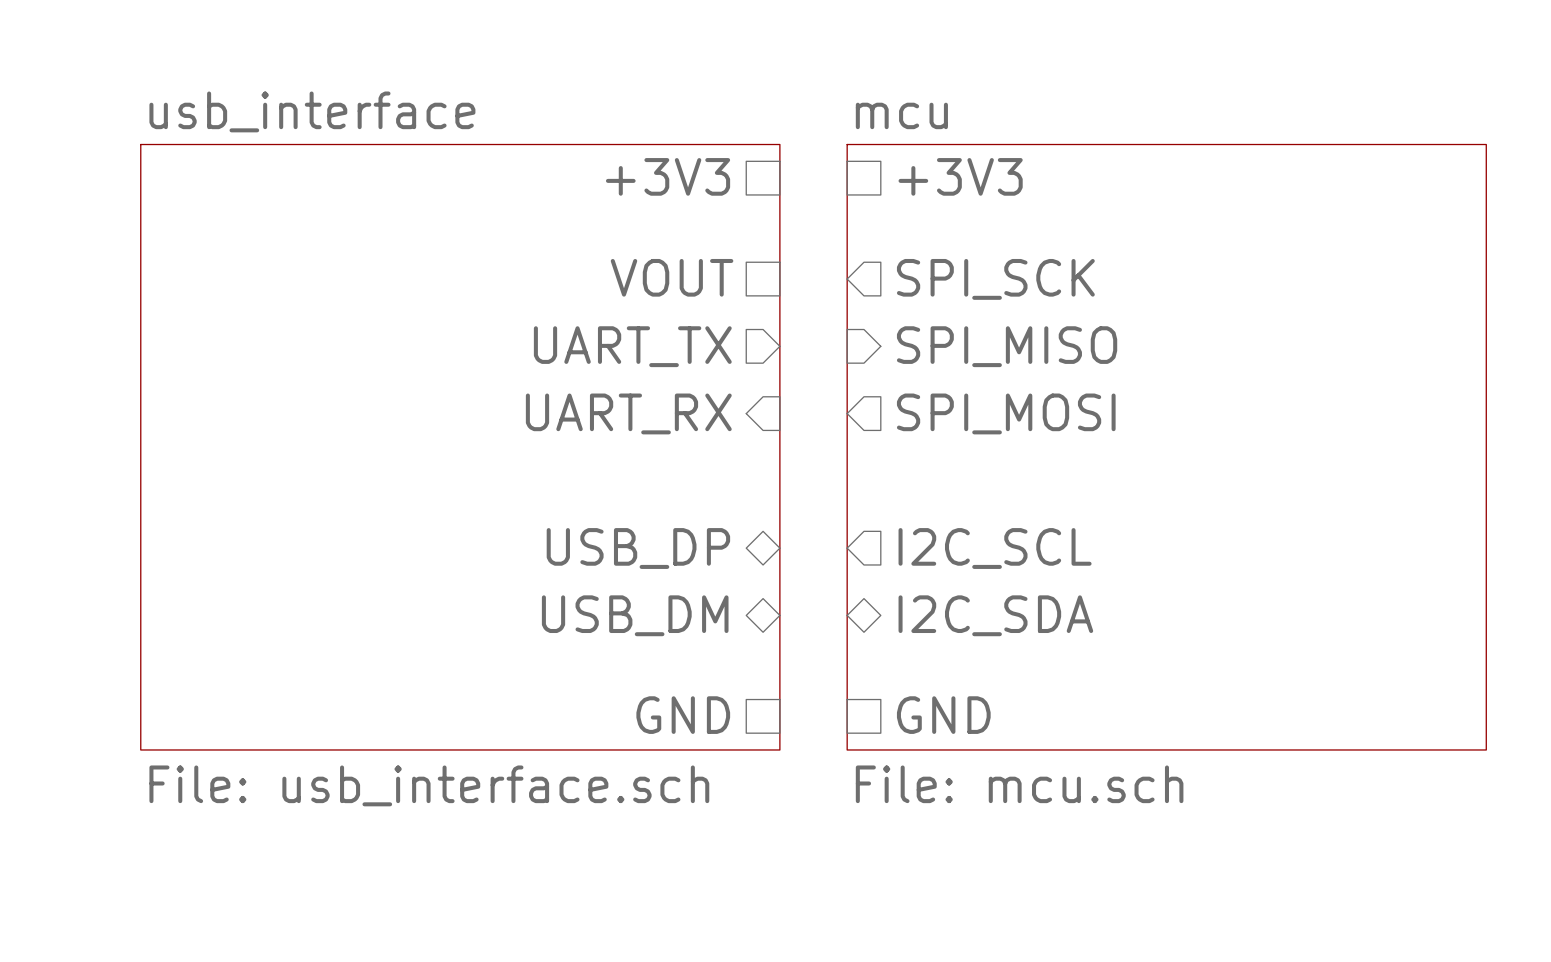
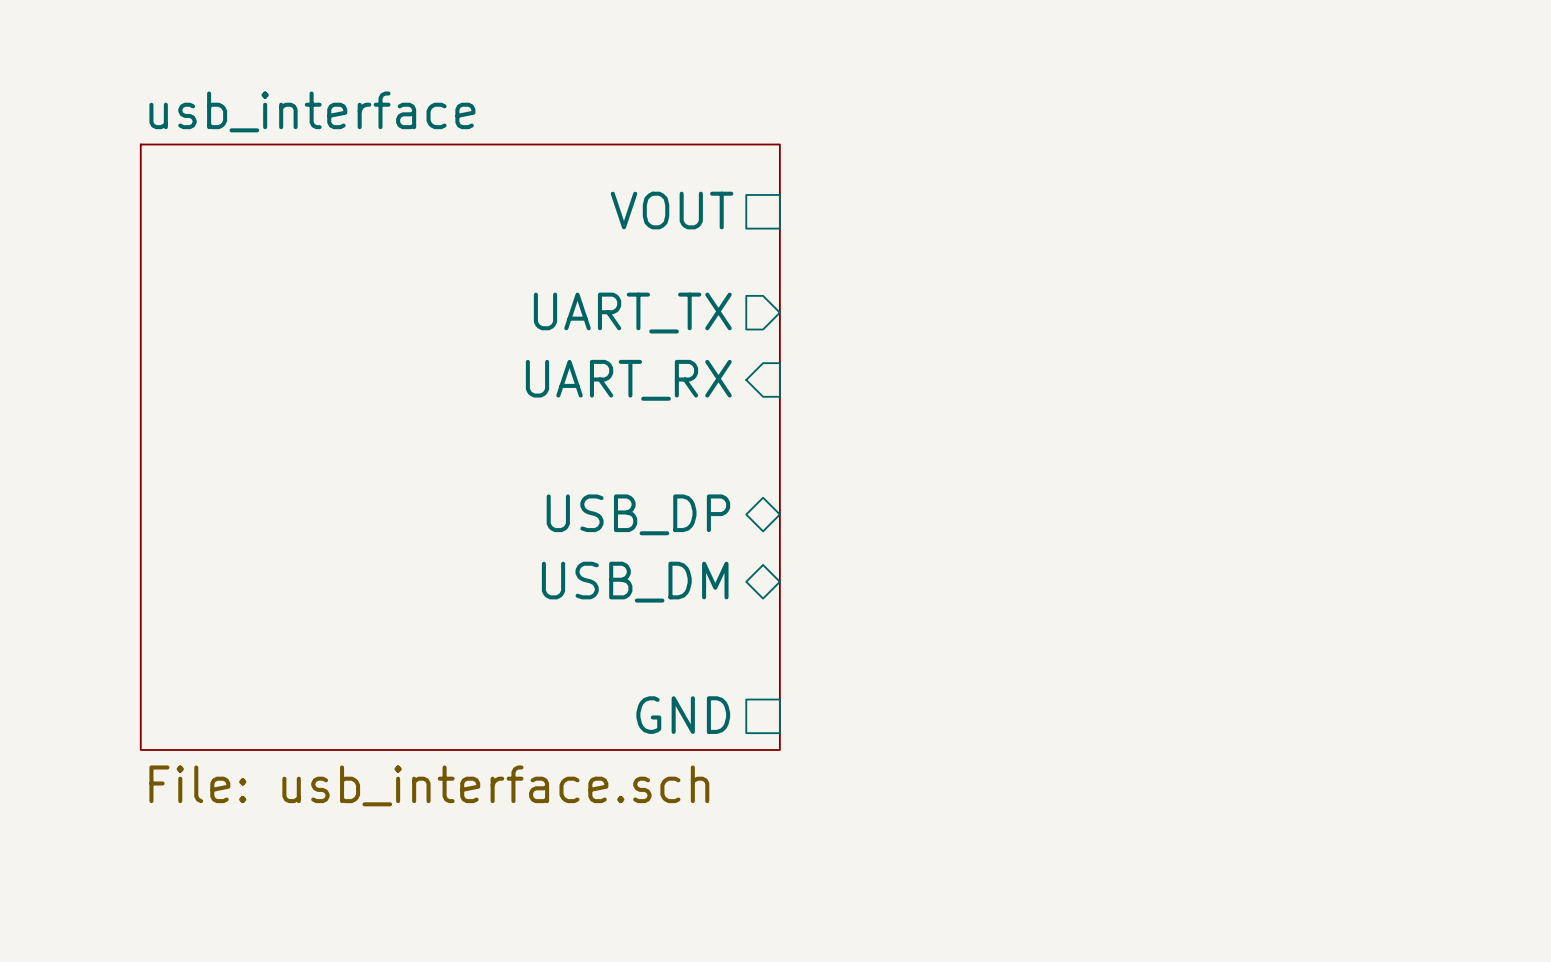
sheet pin: +3V3 (668, 176) -> none
sheet pin: +3V3 (960, 176) -> none
sheet pin position: VOUT (672, 277) -> VOUT (672, 210)
sheet pin: SPI_SCK (995, 279) -> none
sheet pin position: UART_TX (632, 346) -> UART_TX (632, 313)
sheet pin: SPI_MISO (1007, 346) -> none
sheet pin position: UART_RX (628, 413) -> UART_RX (628, 380)
sheet pin: SPI_MOSI (1006, 413) -> none
sheet mcu: File: mcu.sch (1166, 447) -> none
sheet pin position: USB_DP (638, 548) -> USB_DP (638, 514)
sheet pin: I2C_SCL (995, 548) -> none
sheet pin position: USB_DM (635, 615) -> USB_DM (635, 582)
sheet pin: I2C_SDA (995, 615) -> none
sheet pin: GND (943, 715) -> none

